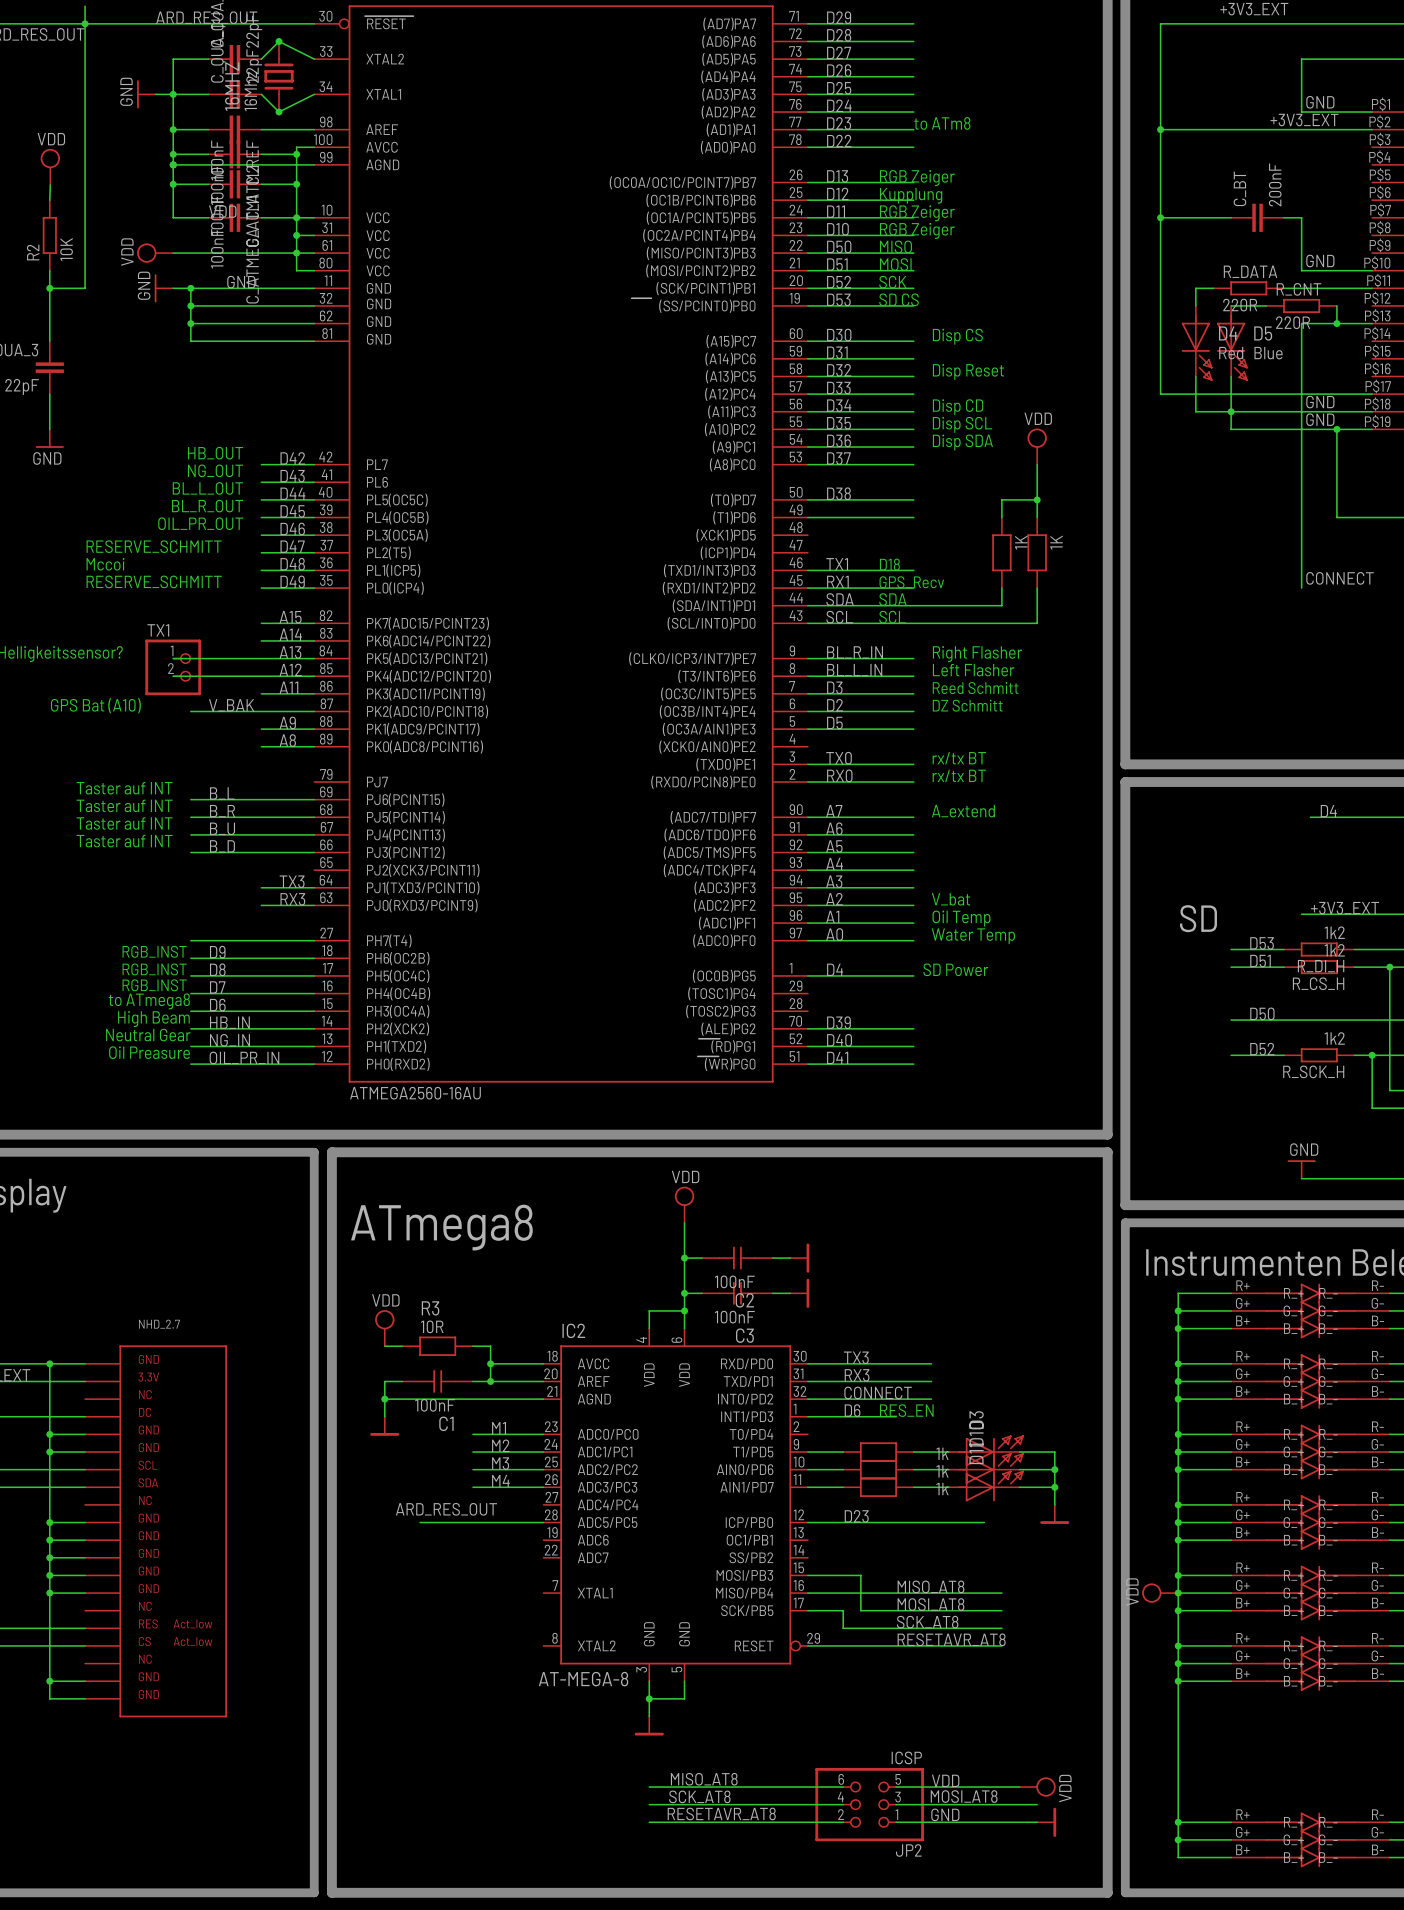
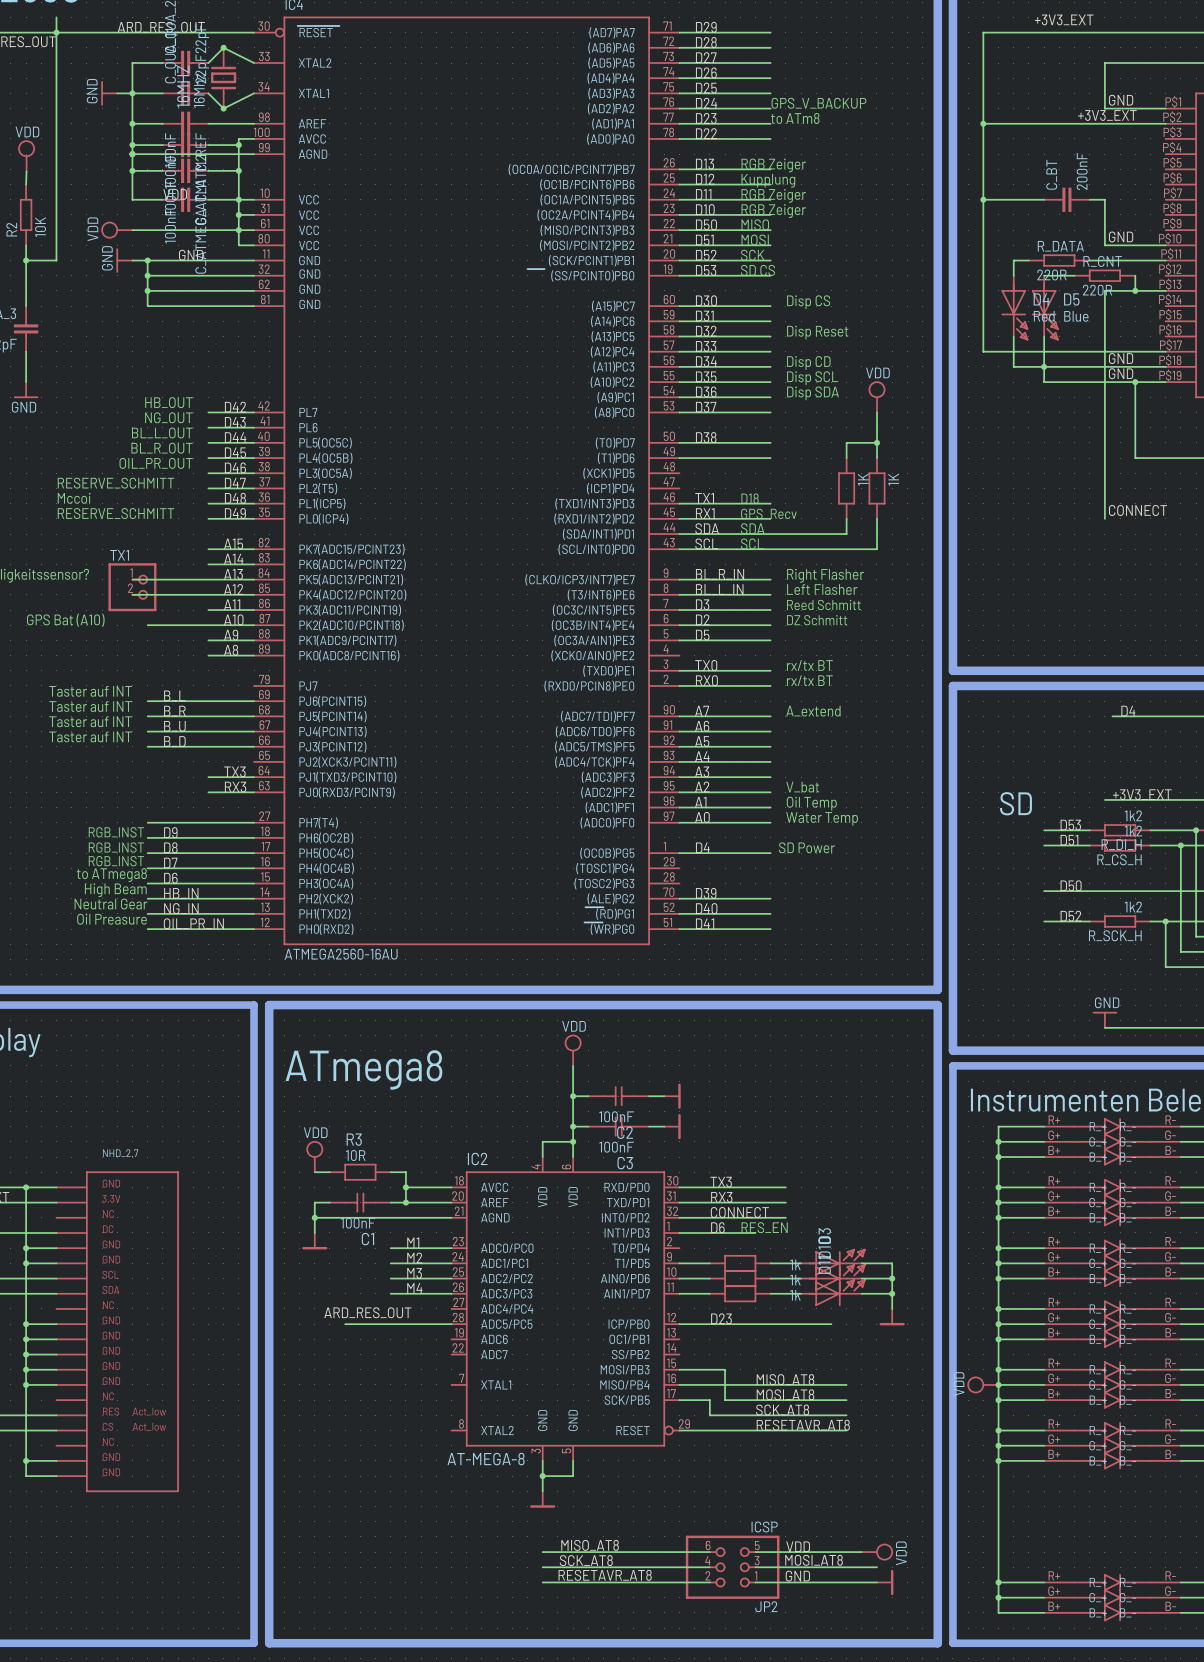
text: none -> GPS_V_BACKUP (818, 103)
label: V_BAK (231, 705) -> none
label: none -> A10 (233, 619)

